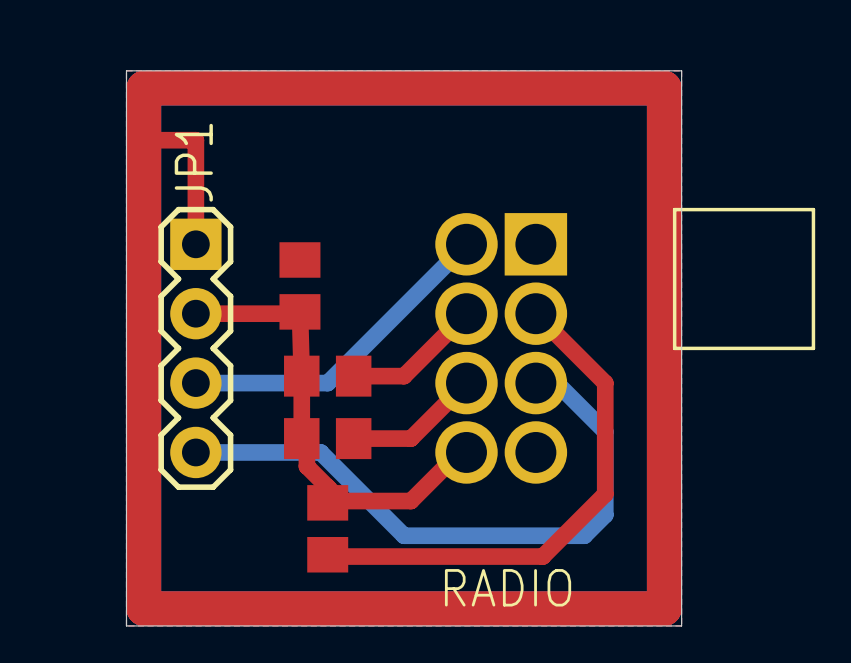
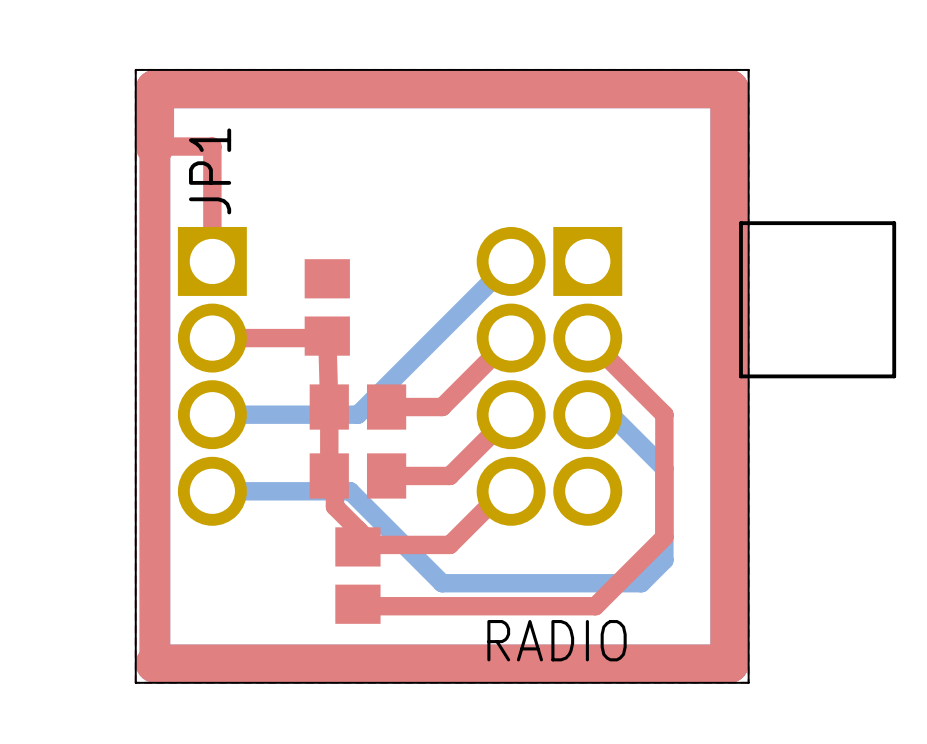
top track width: thick (143, 140) (143, 608) -> thin (154, 146) (154, 663)
JP1 footprint: [158, 206, 234, 490] -> [177, 226, 247, 526]

